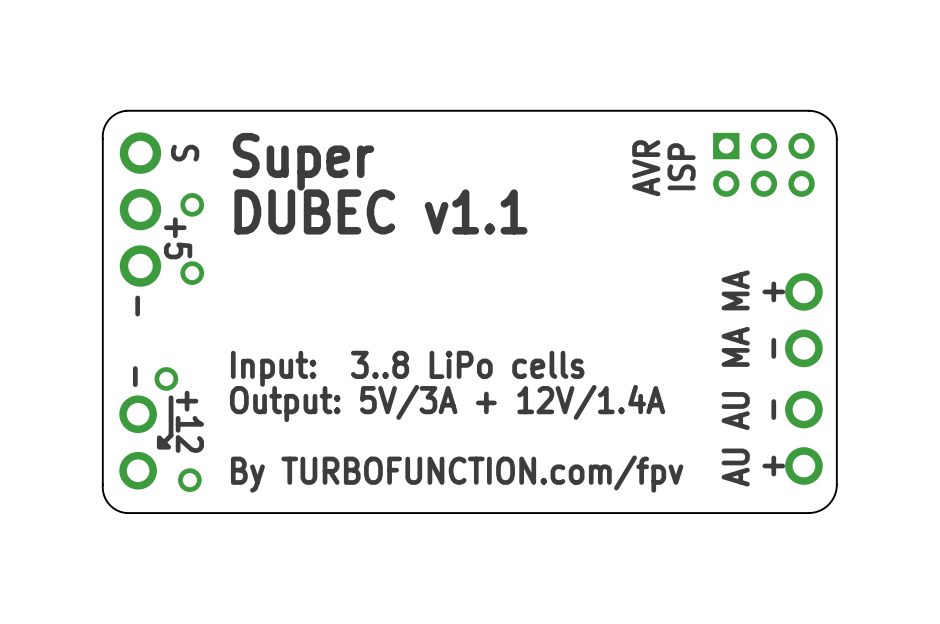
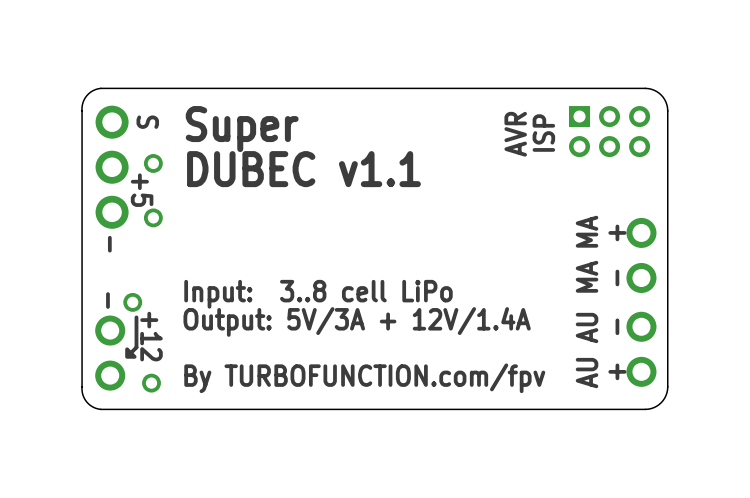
text: Input: 3..8 LiPo cells (407, 368) -> Input: 3..8 cell LiPo (318, 294)

